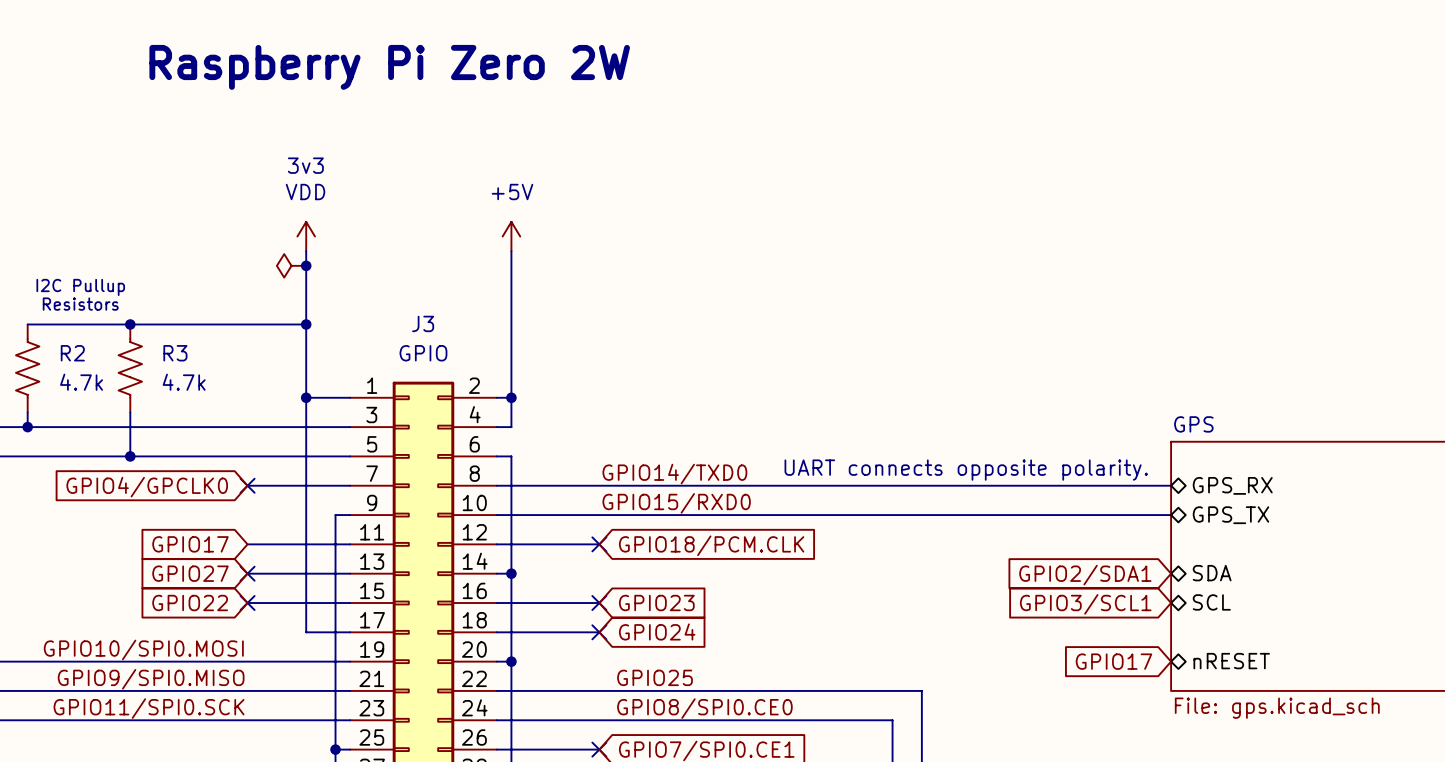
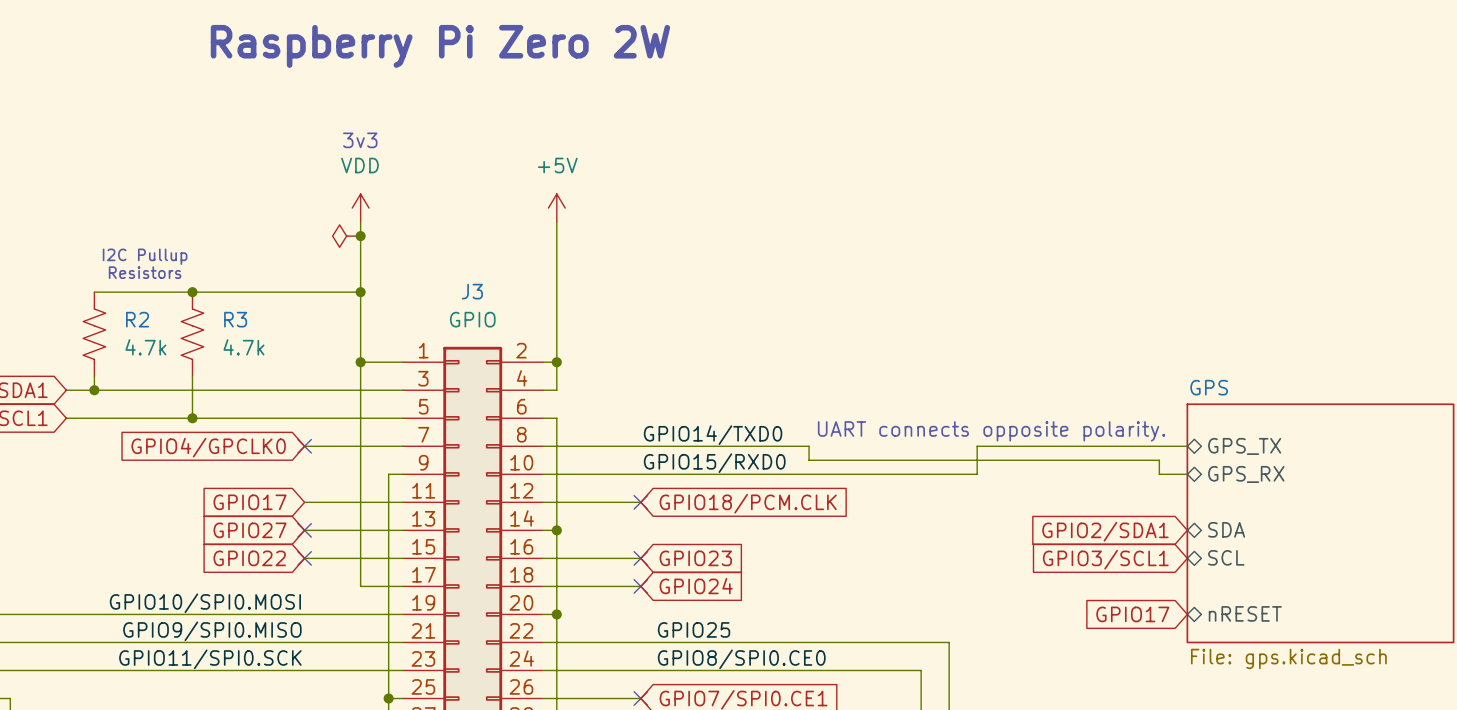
wire: (775, 485) (951, 485) -> (977, 474) (977, 446)
sheet pin: GPS_RX (1232, 485) -> GPS_TX (1244, 446)
wire: (951, 515) (1141, 515) -> (809, 446) (809, 460) (1159, 460) (1159, 474)
sheet pin: GPS_TX (1230, 515) -> GPS_RX (1246, 474)

